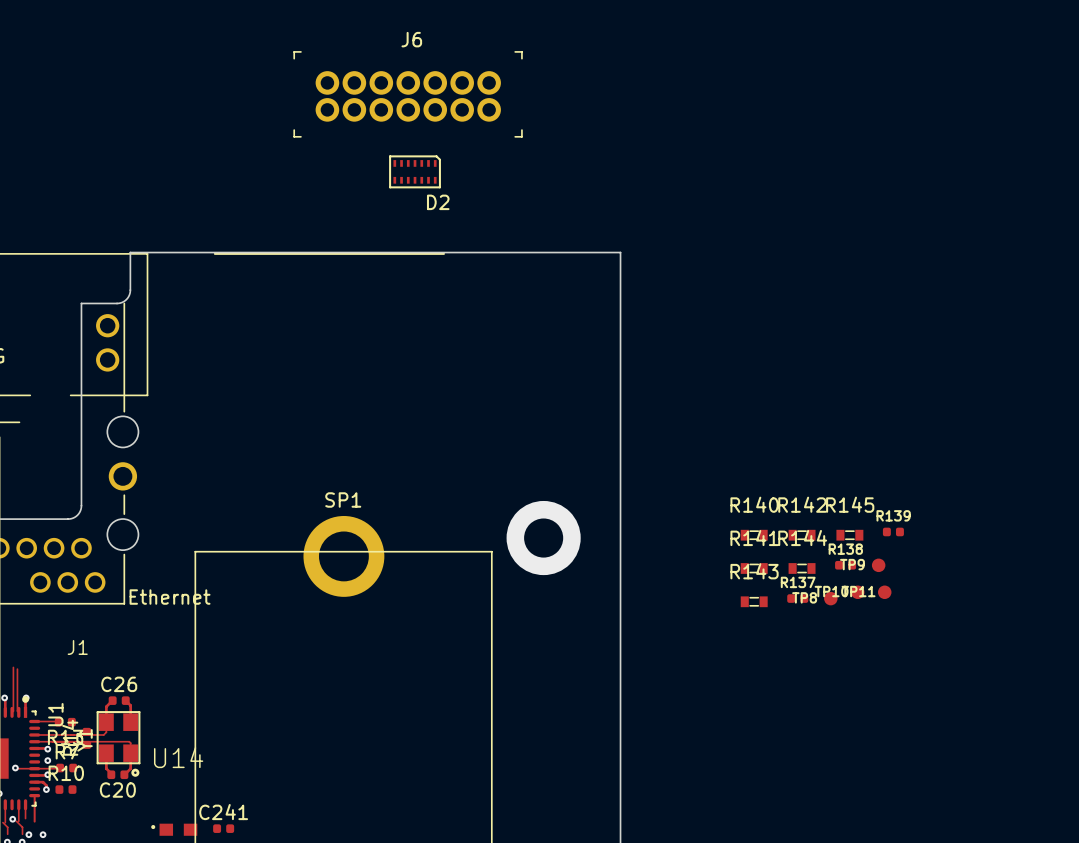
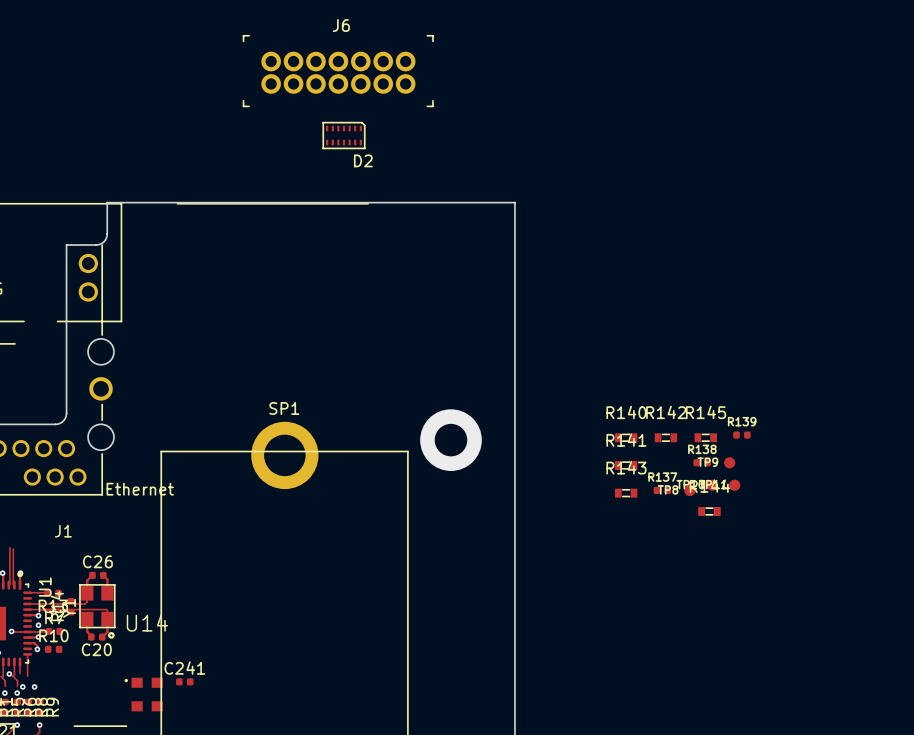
R144 position: (802, 568) -> (709, 511)

